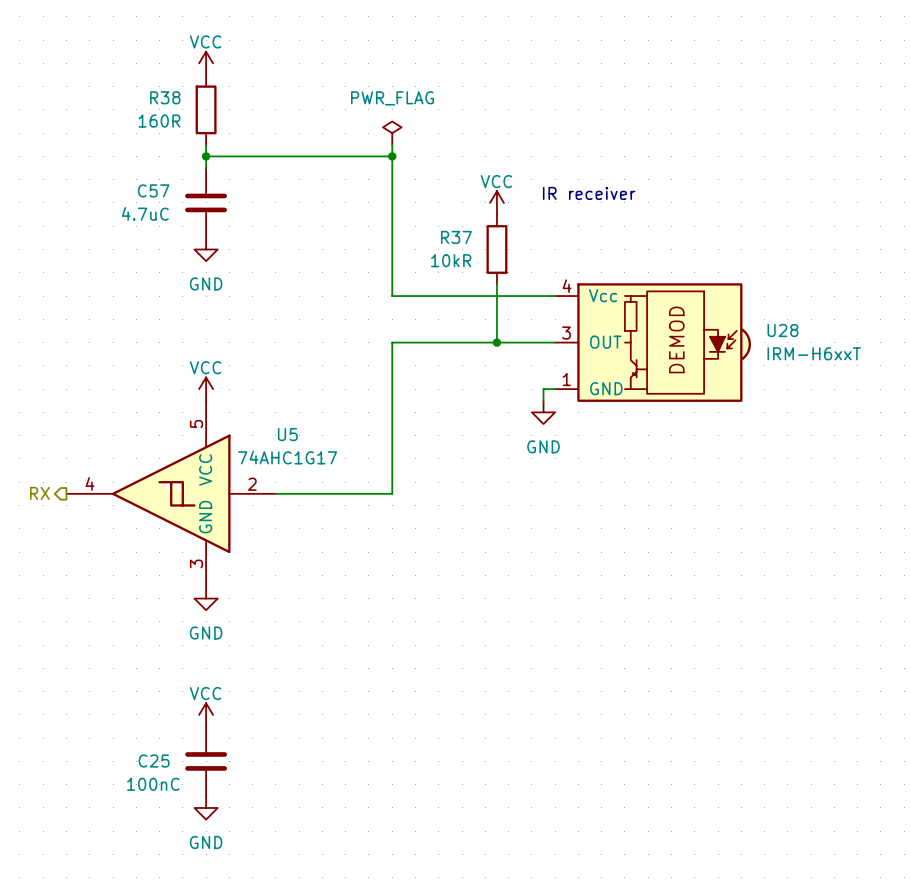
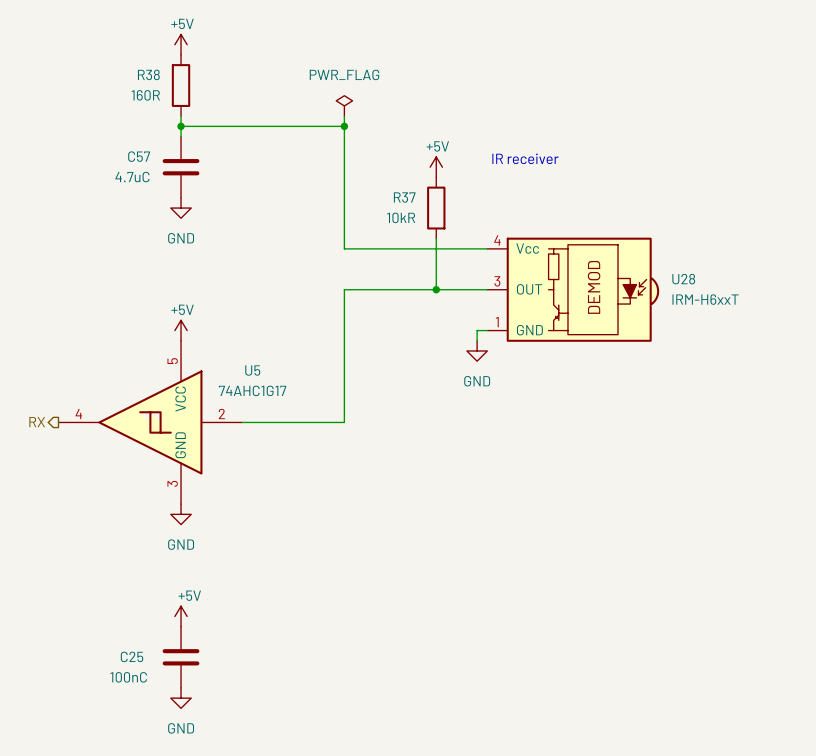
power symbol: VCC (206, 63) -> +5V (181, 44)
power symbol: VCC (496, 202) -> +5V (436, 167)
power symbol: VCC (206, 389) -> +5V (181, 330)
power symbol: VCC (206, 714) -> +5V (181, 616)

